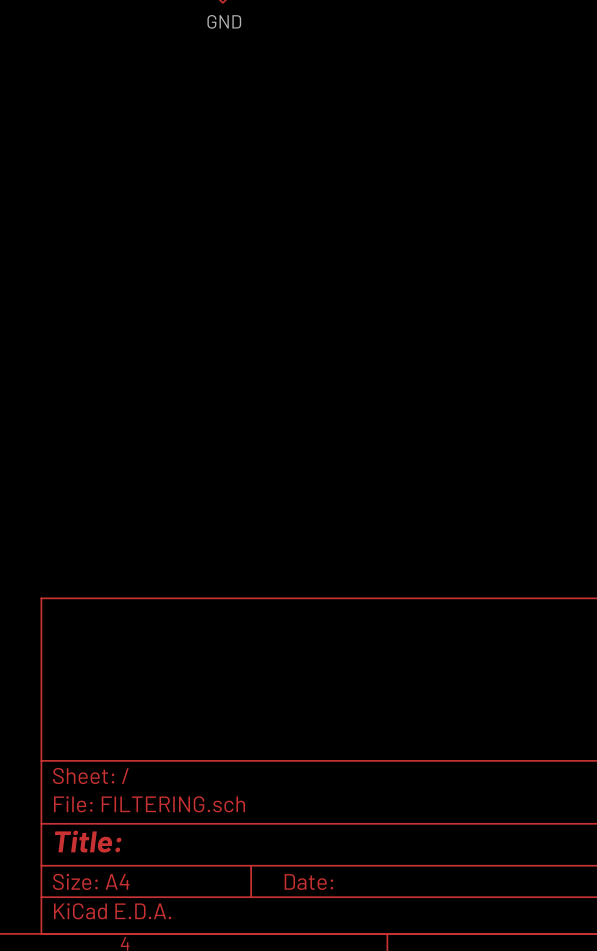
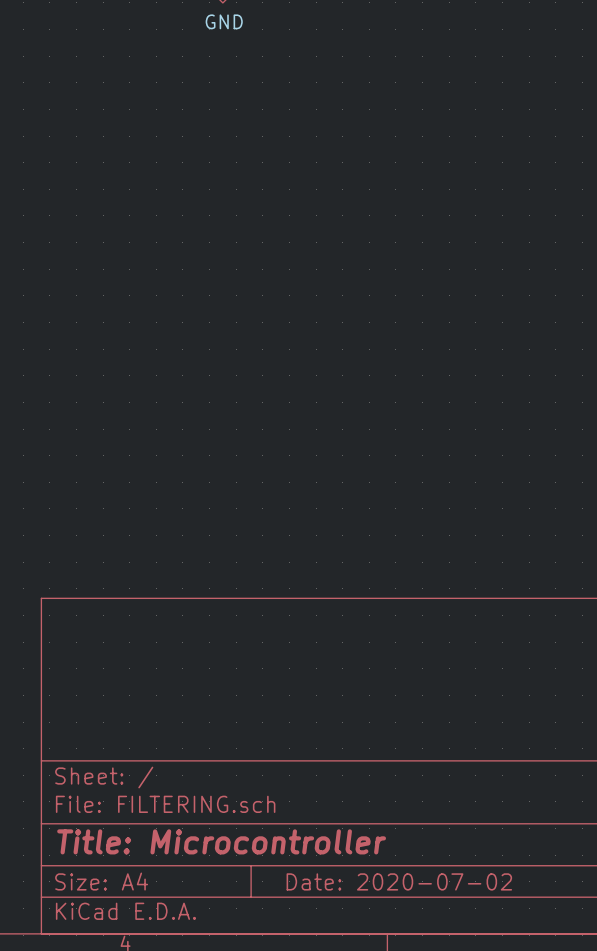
title block: Title: (88, 841) -> Title: Microcontroller (221, 841)
title block: Date: (308, 882) -> Date: 2020-07-02 (399, 881)

